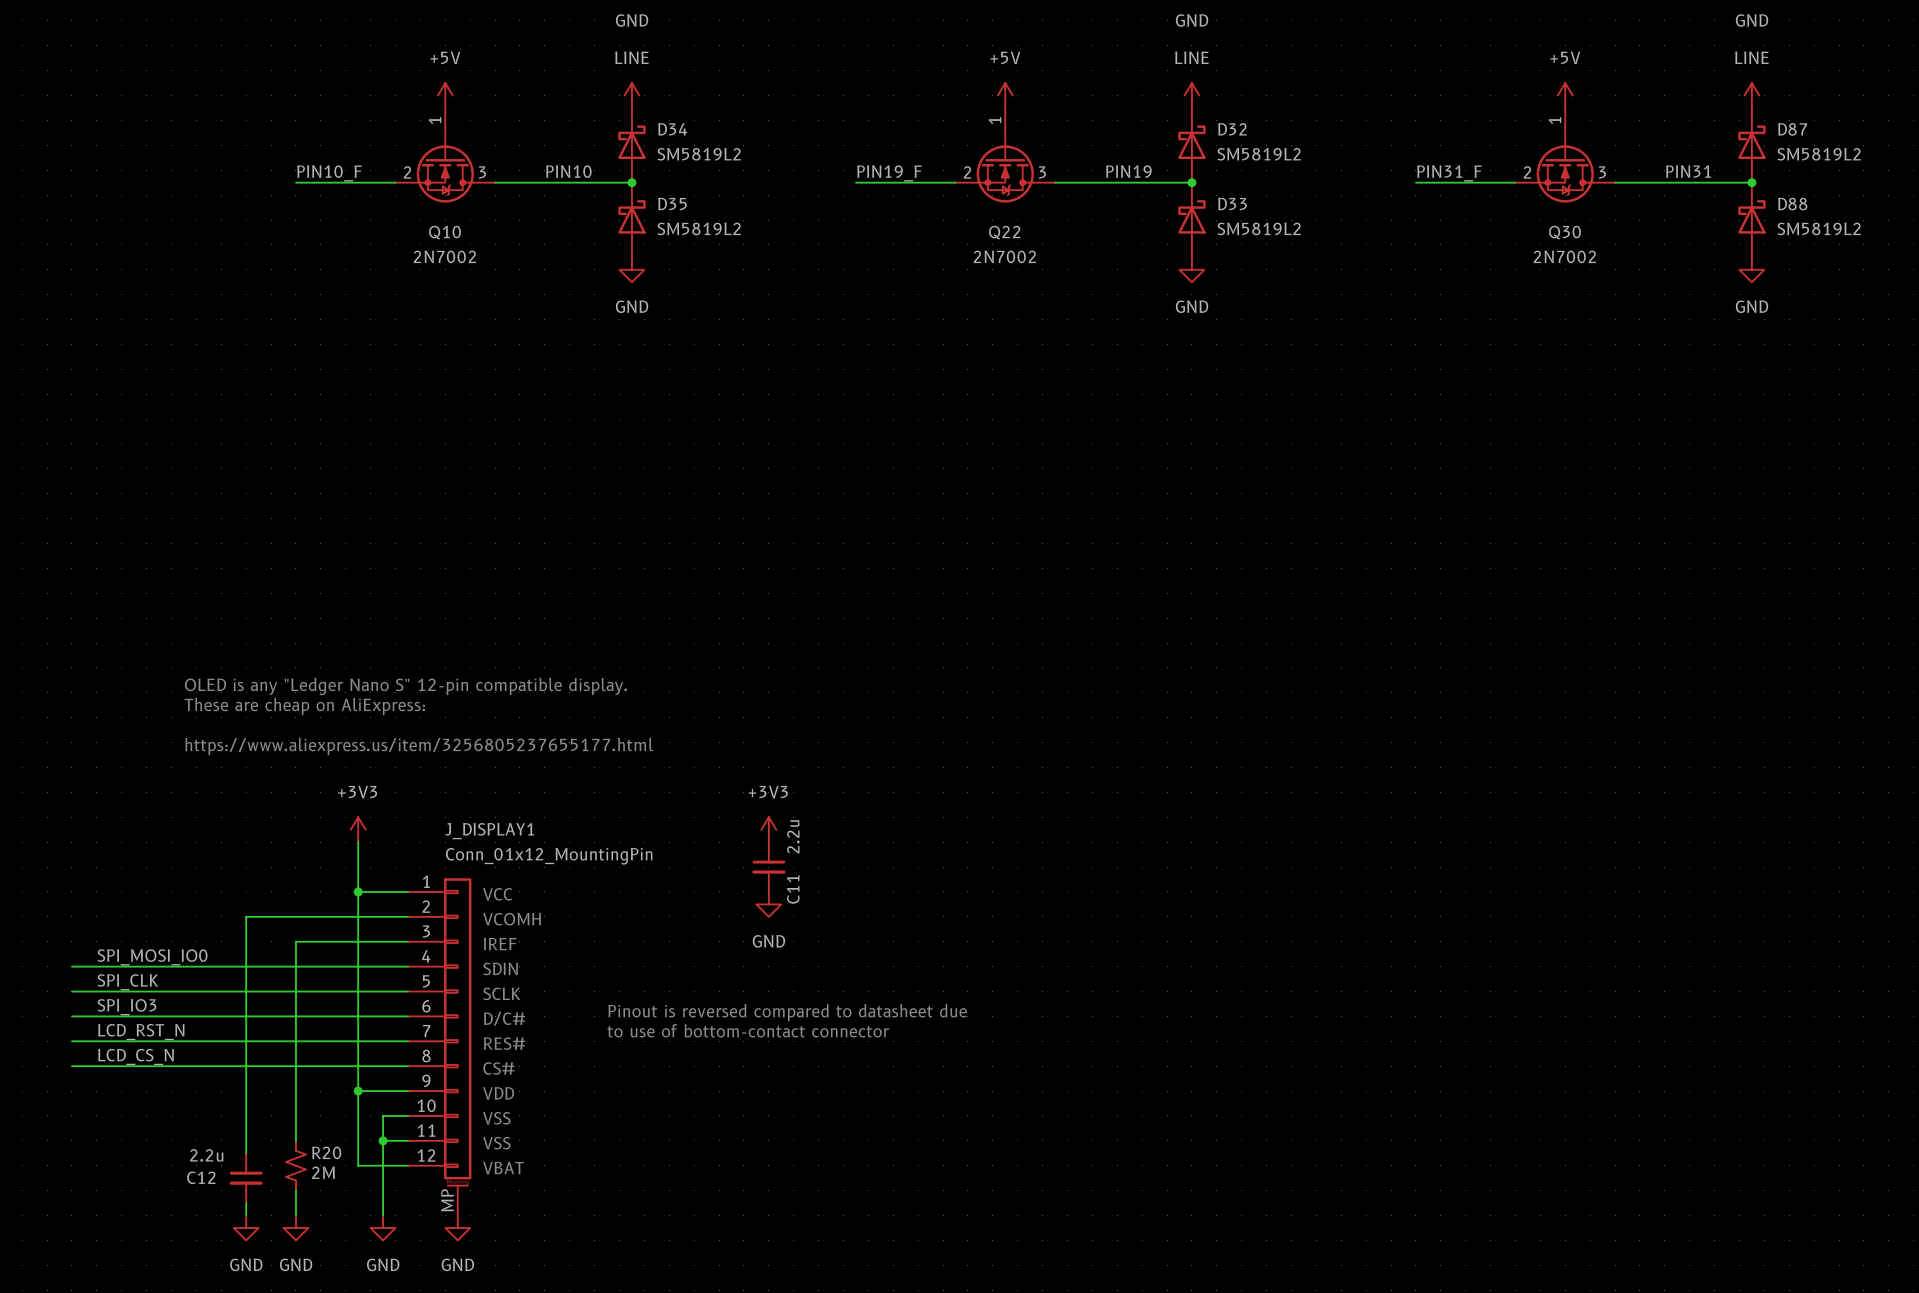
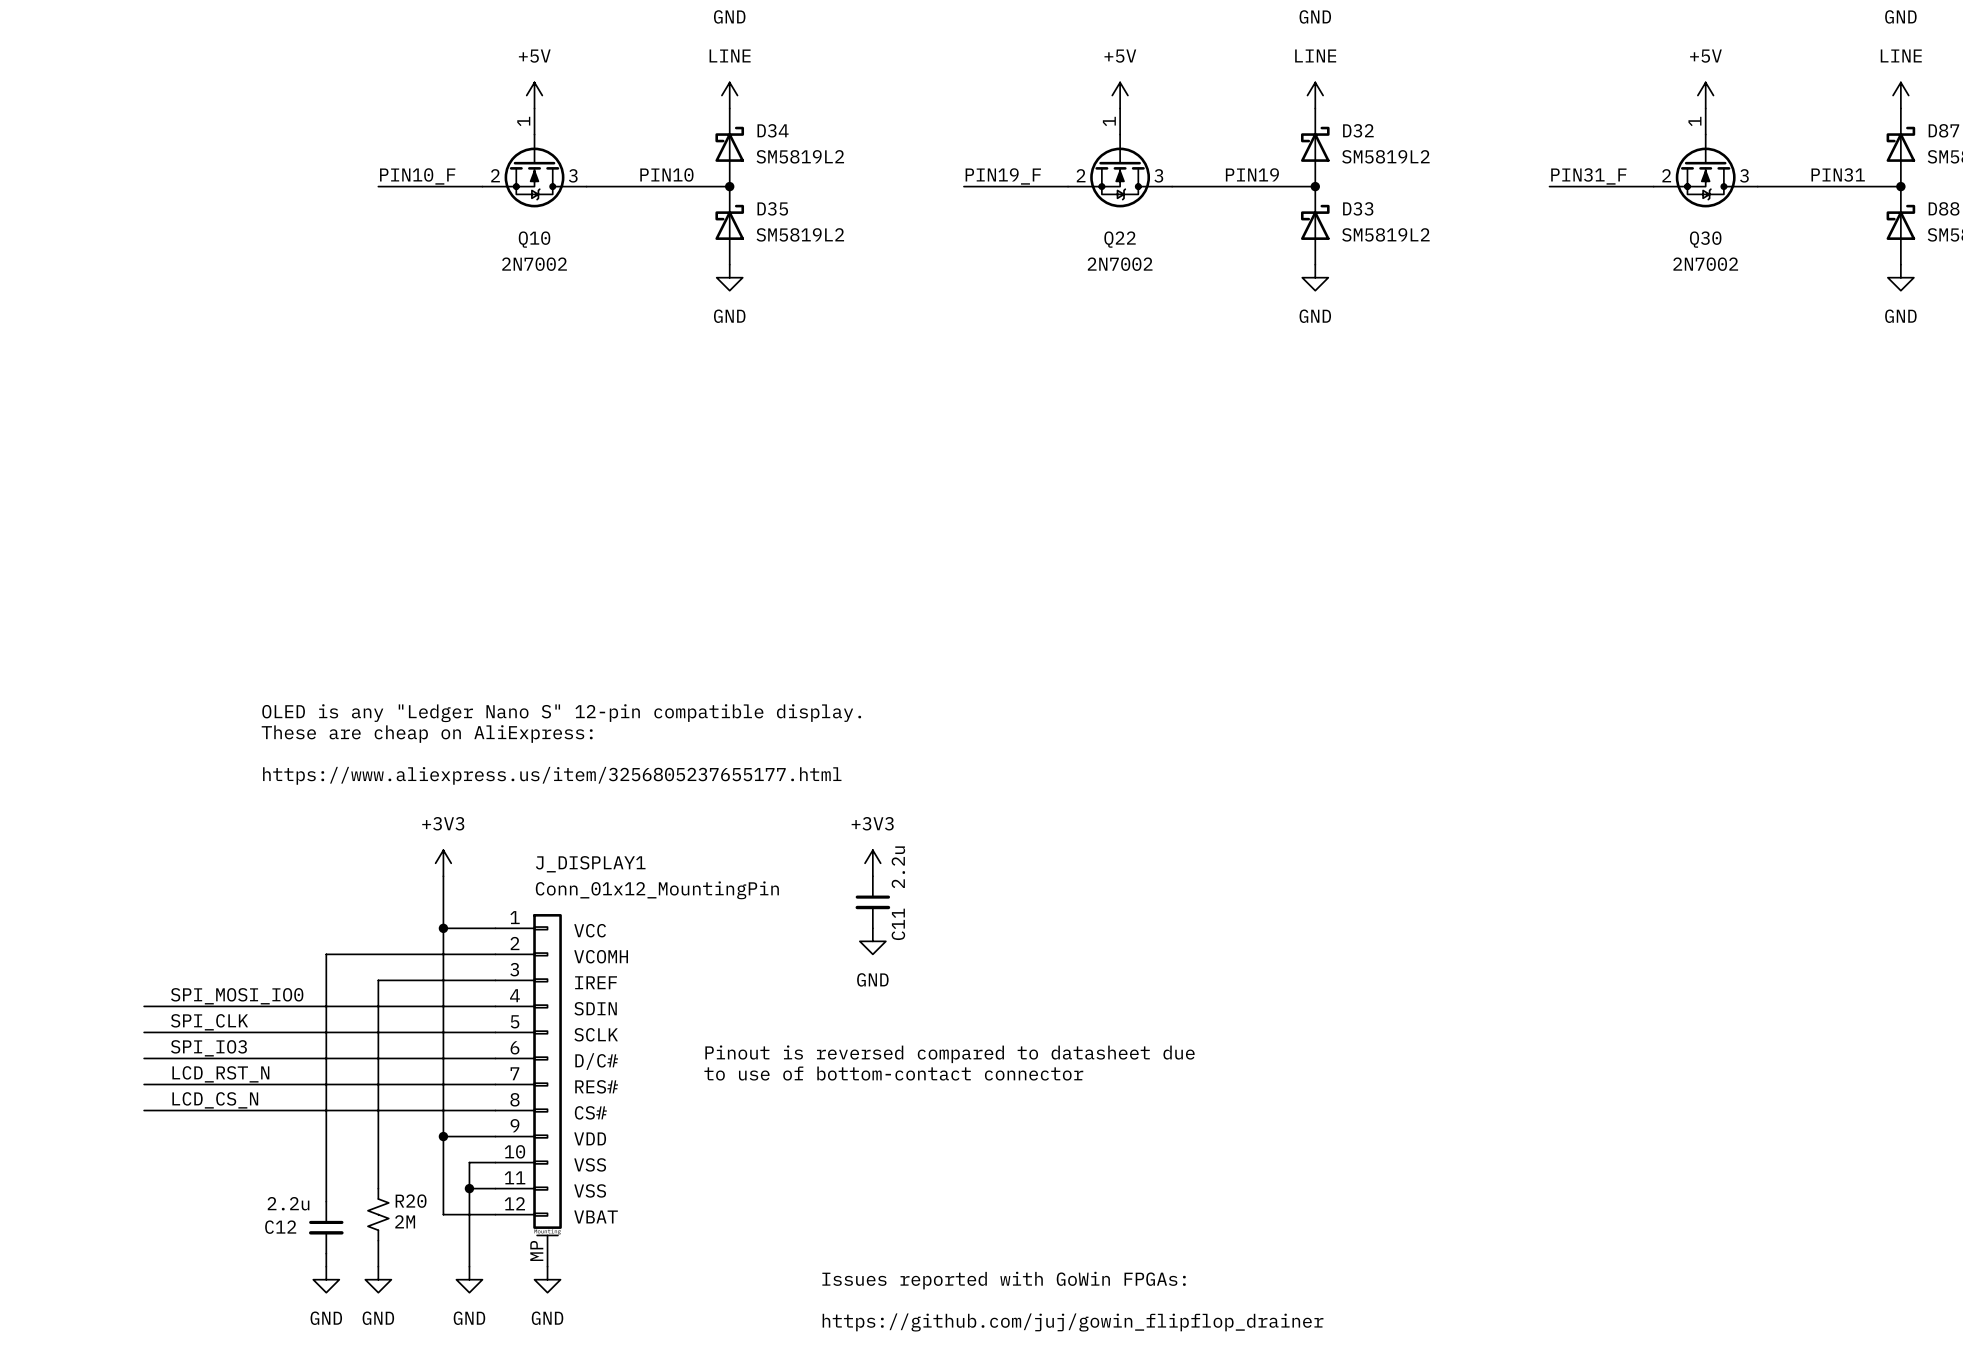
text: none -> Issues reported with GoWin FPGAs: (1004, 1280)
text: none -> https://github.com/juj/gowin_flipflop_drainer (1073, 1322)

